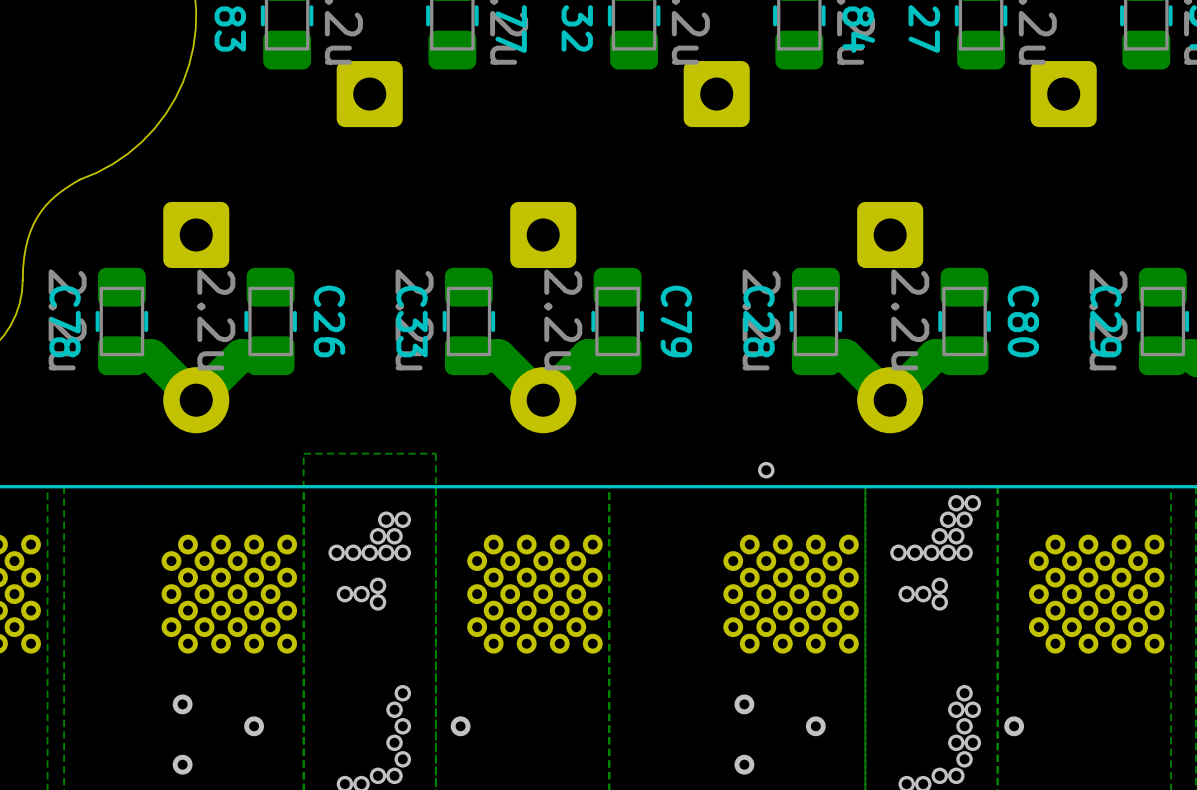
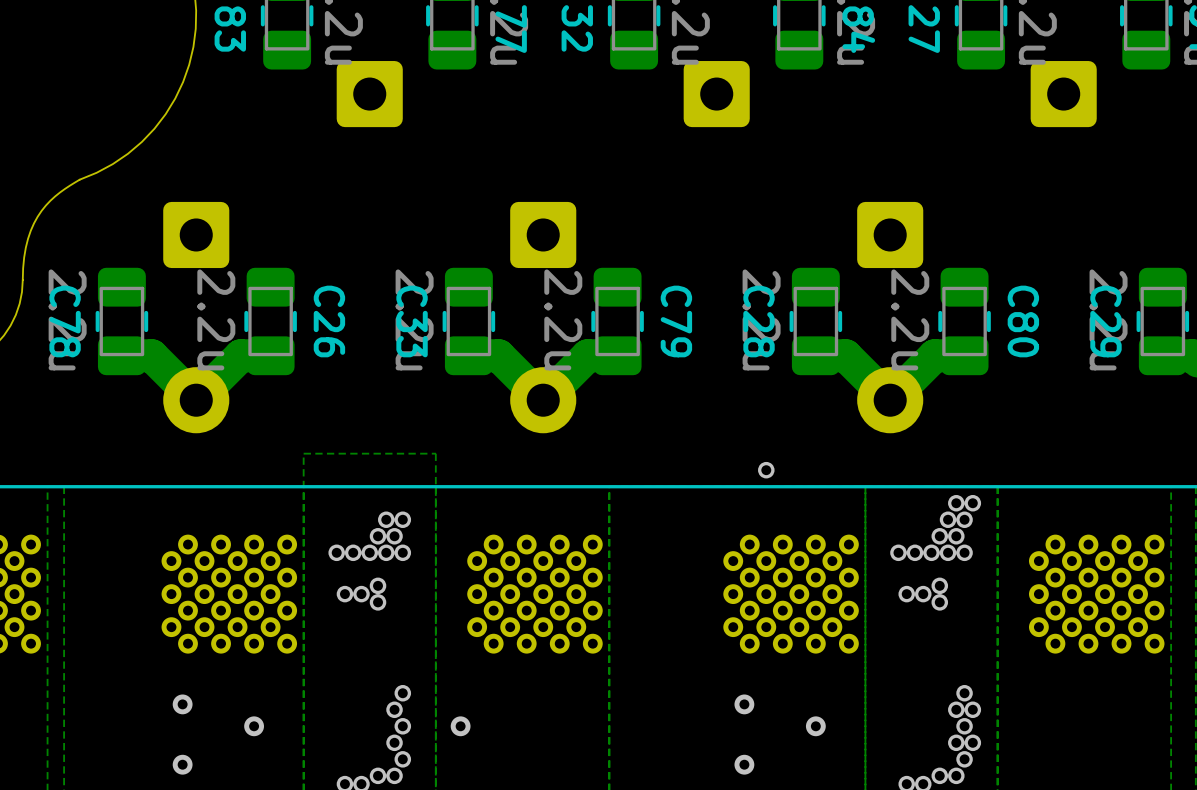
via: (1014, 726) -> none

